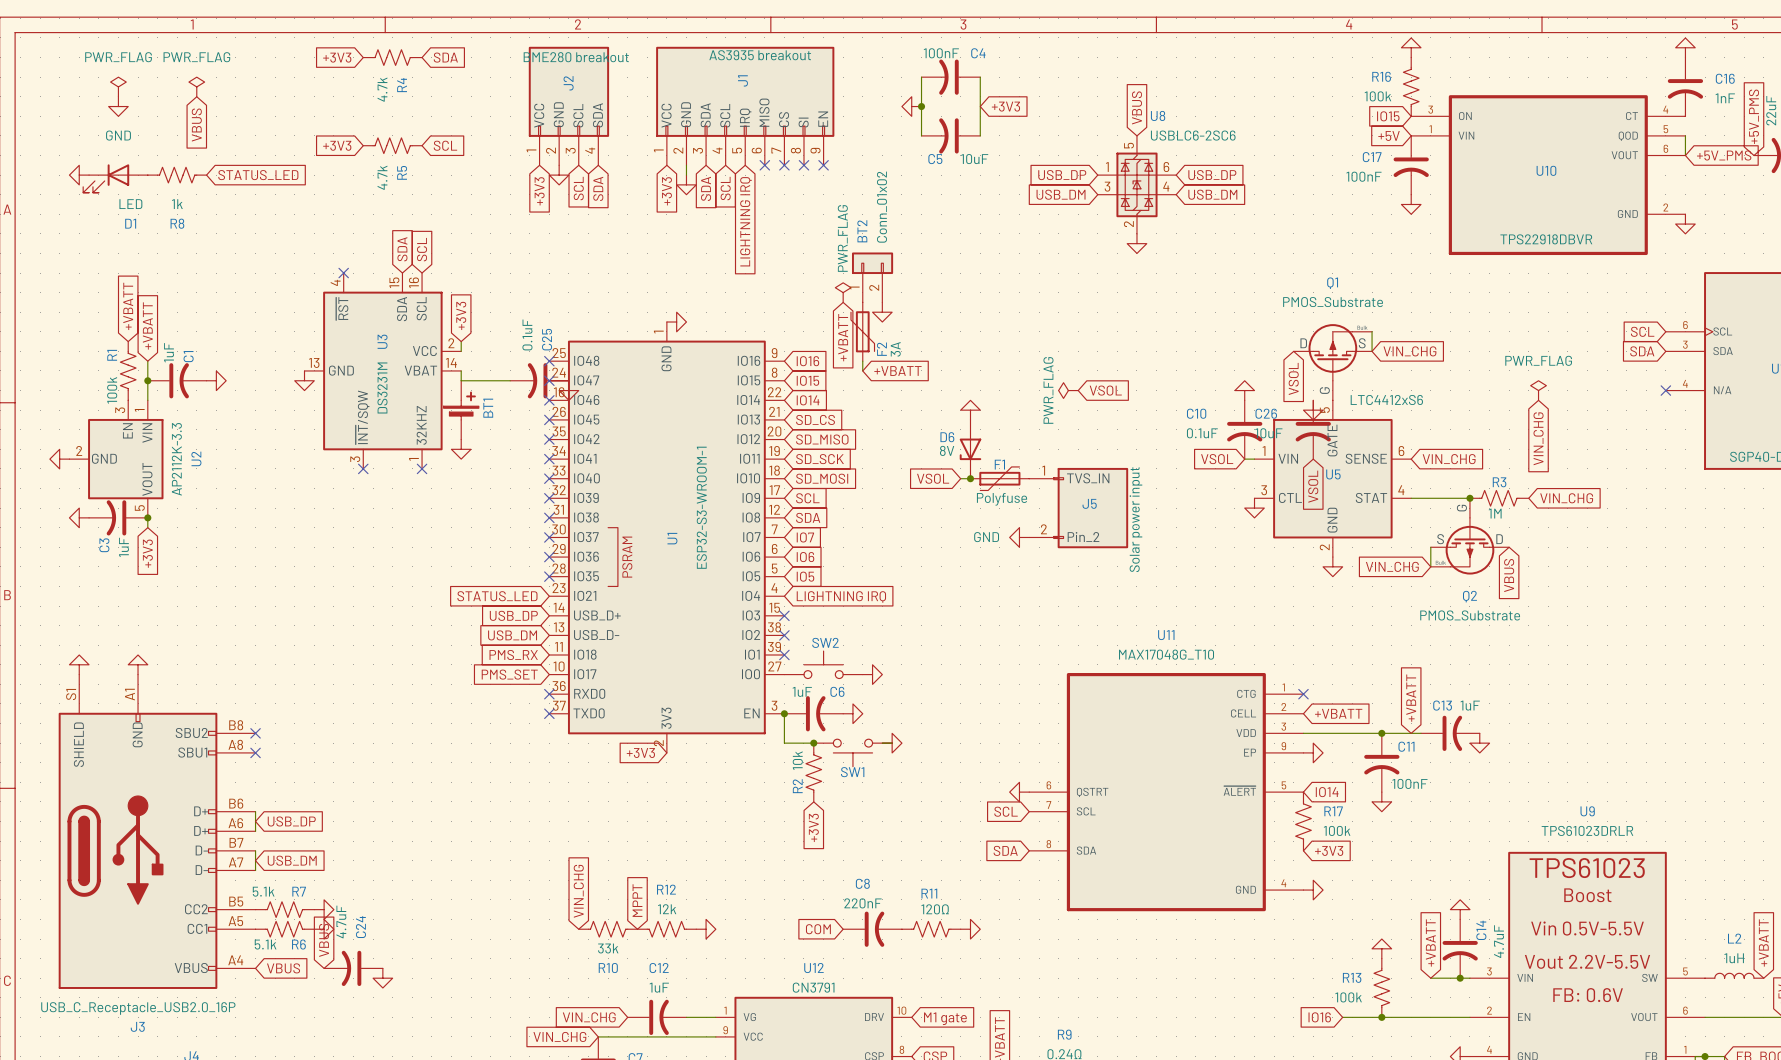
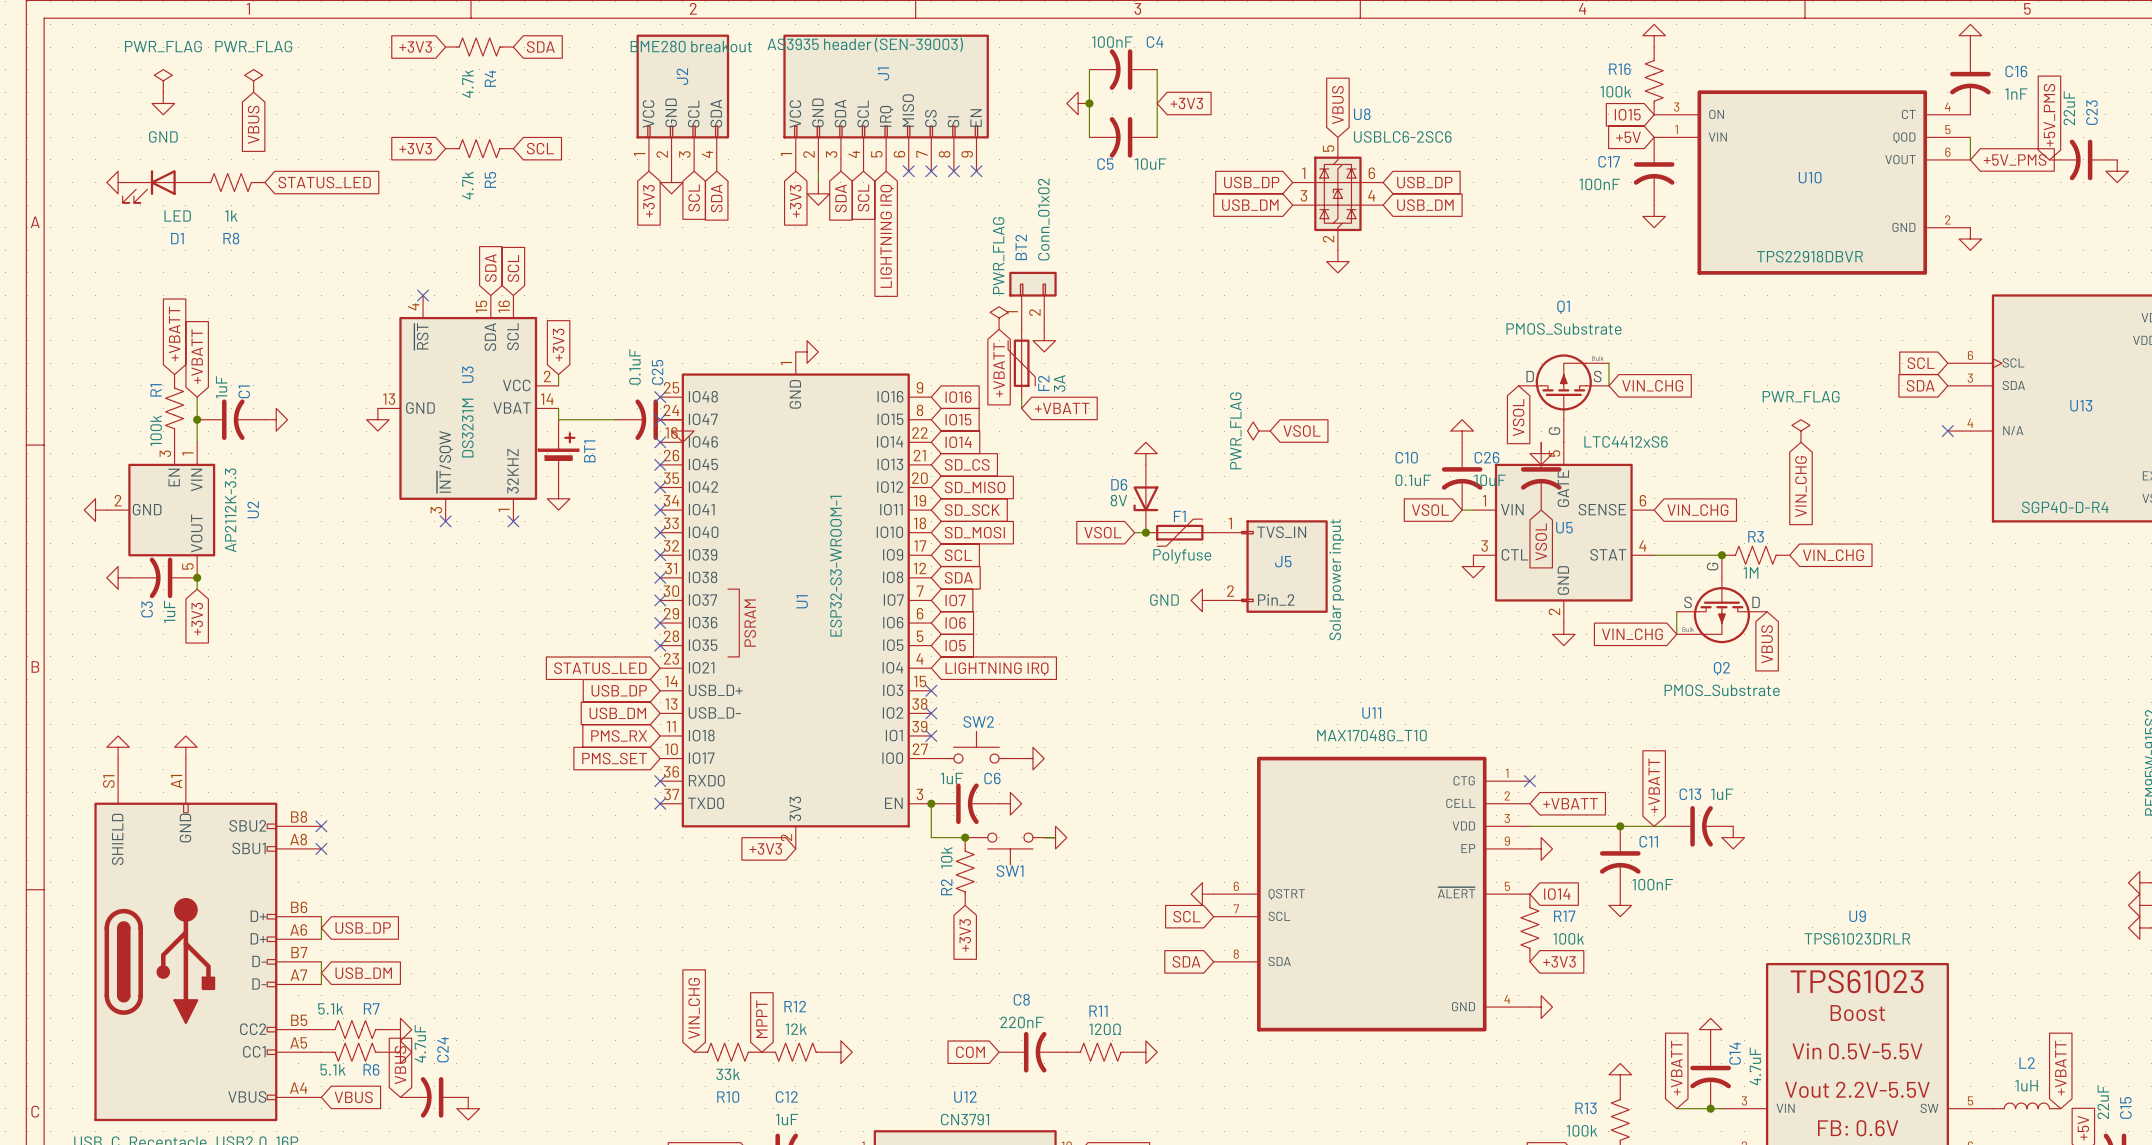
J1 value: AS3935 breakout (760, 55) -> AS3935 header (SEN-39003) (865, 44)

